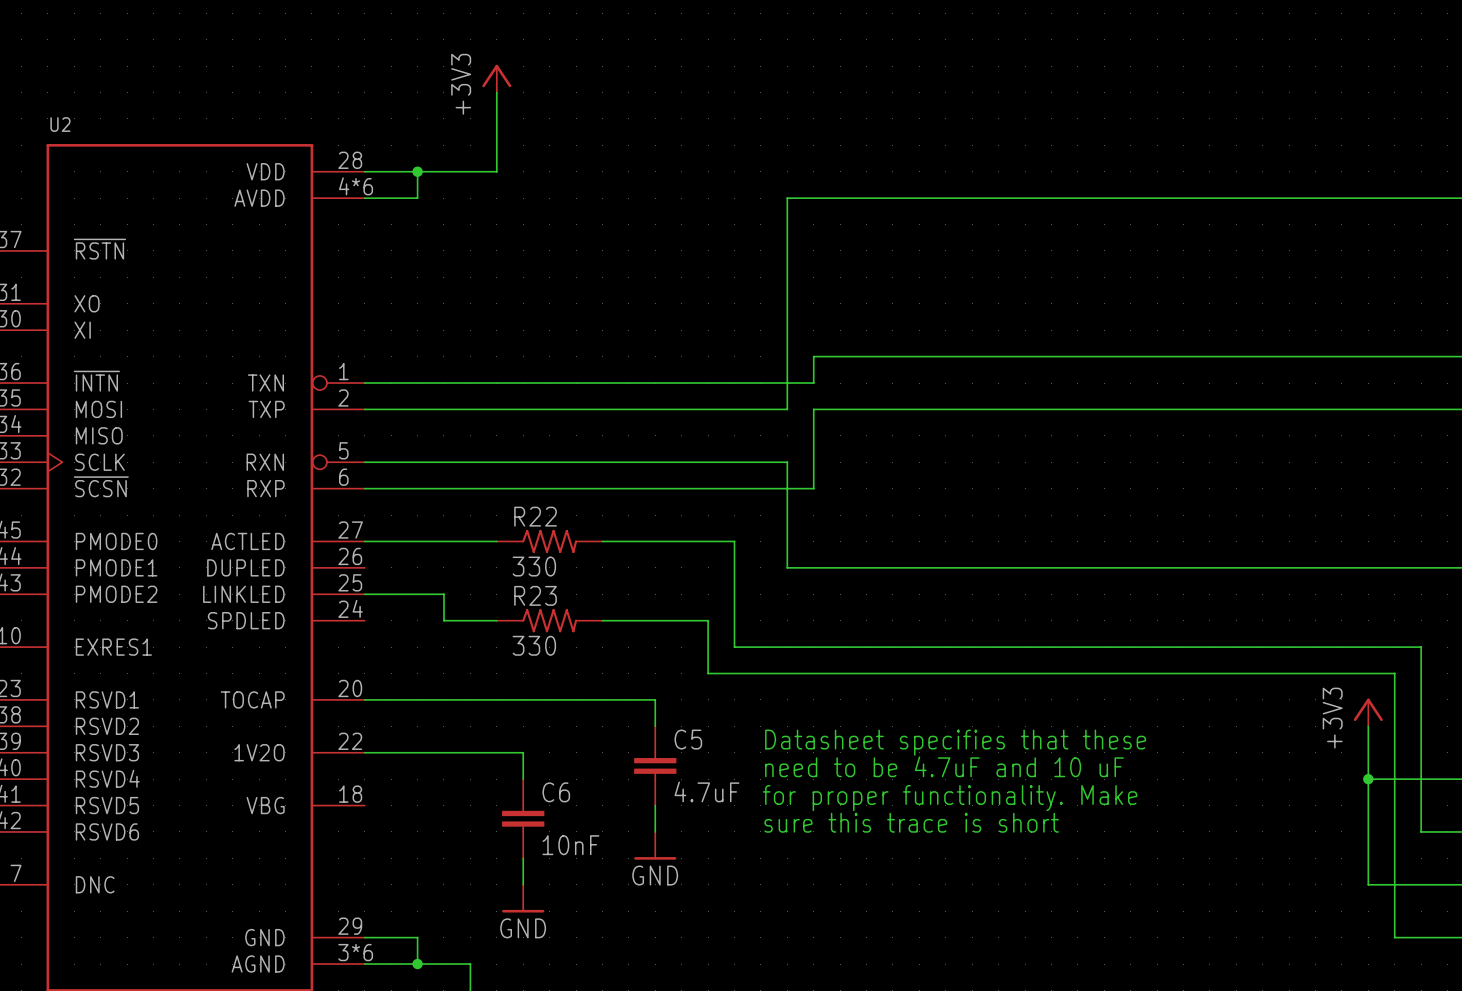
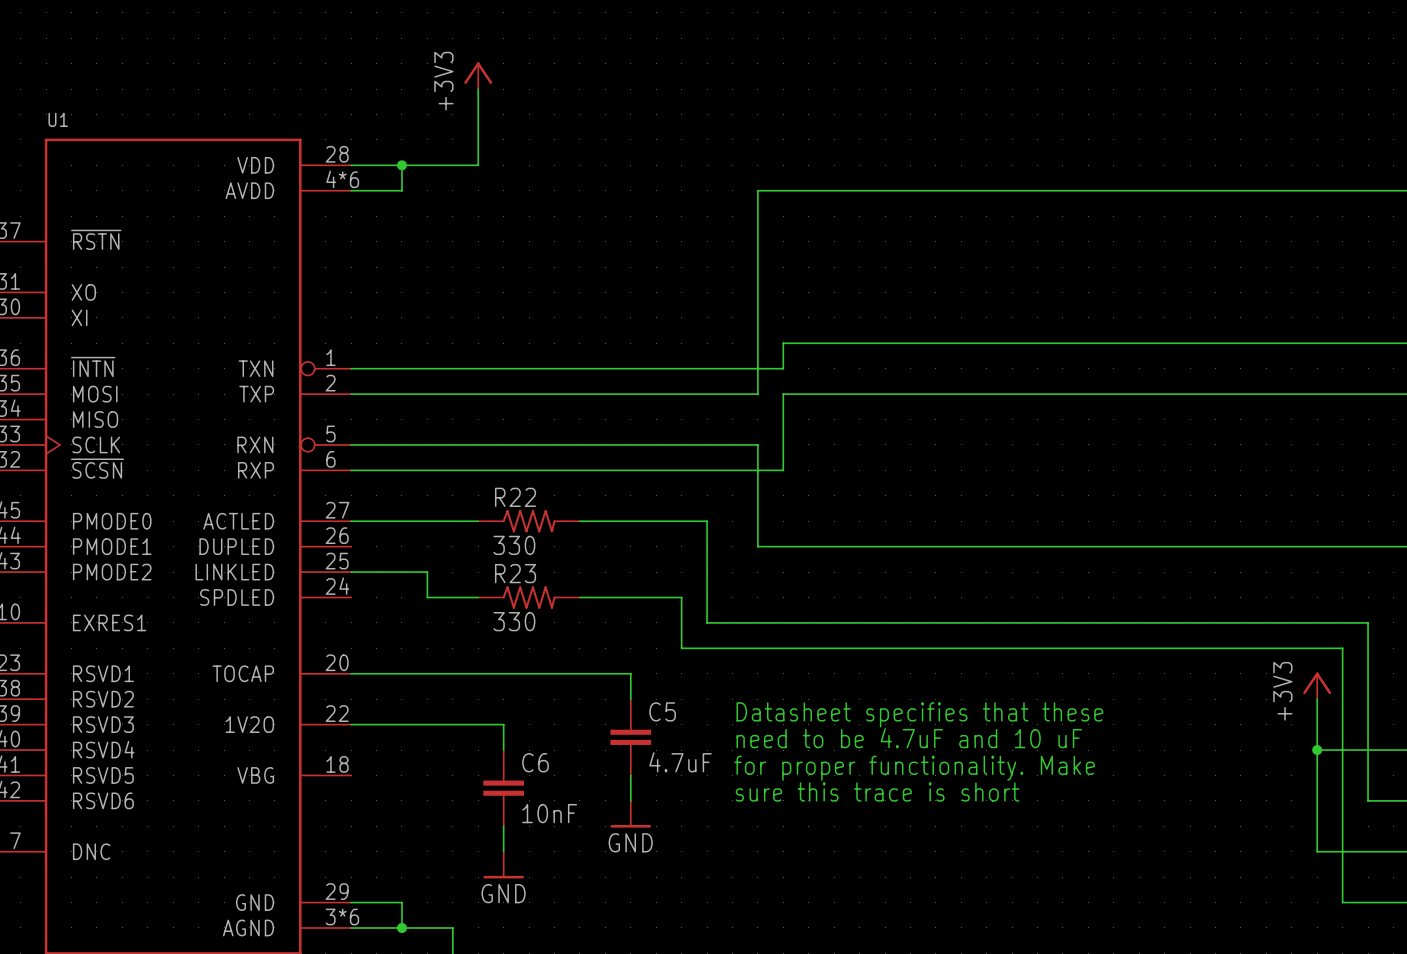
U2 name: U2 (60, 124) -> U1 (58, 119)

